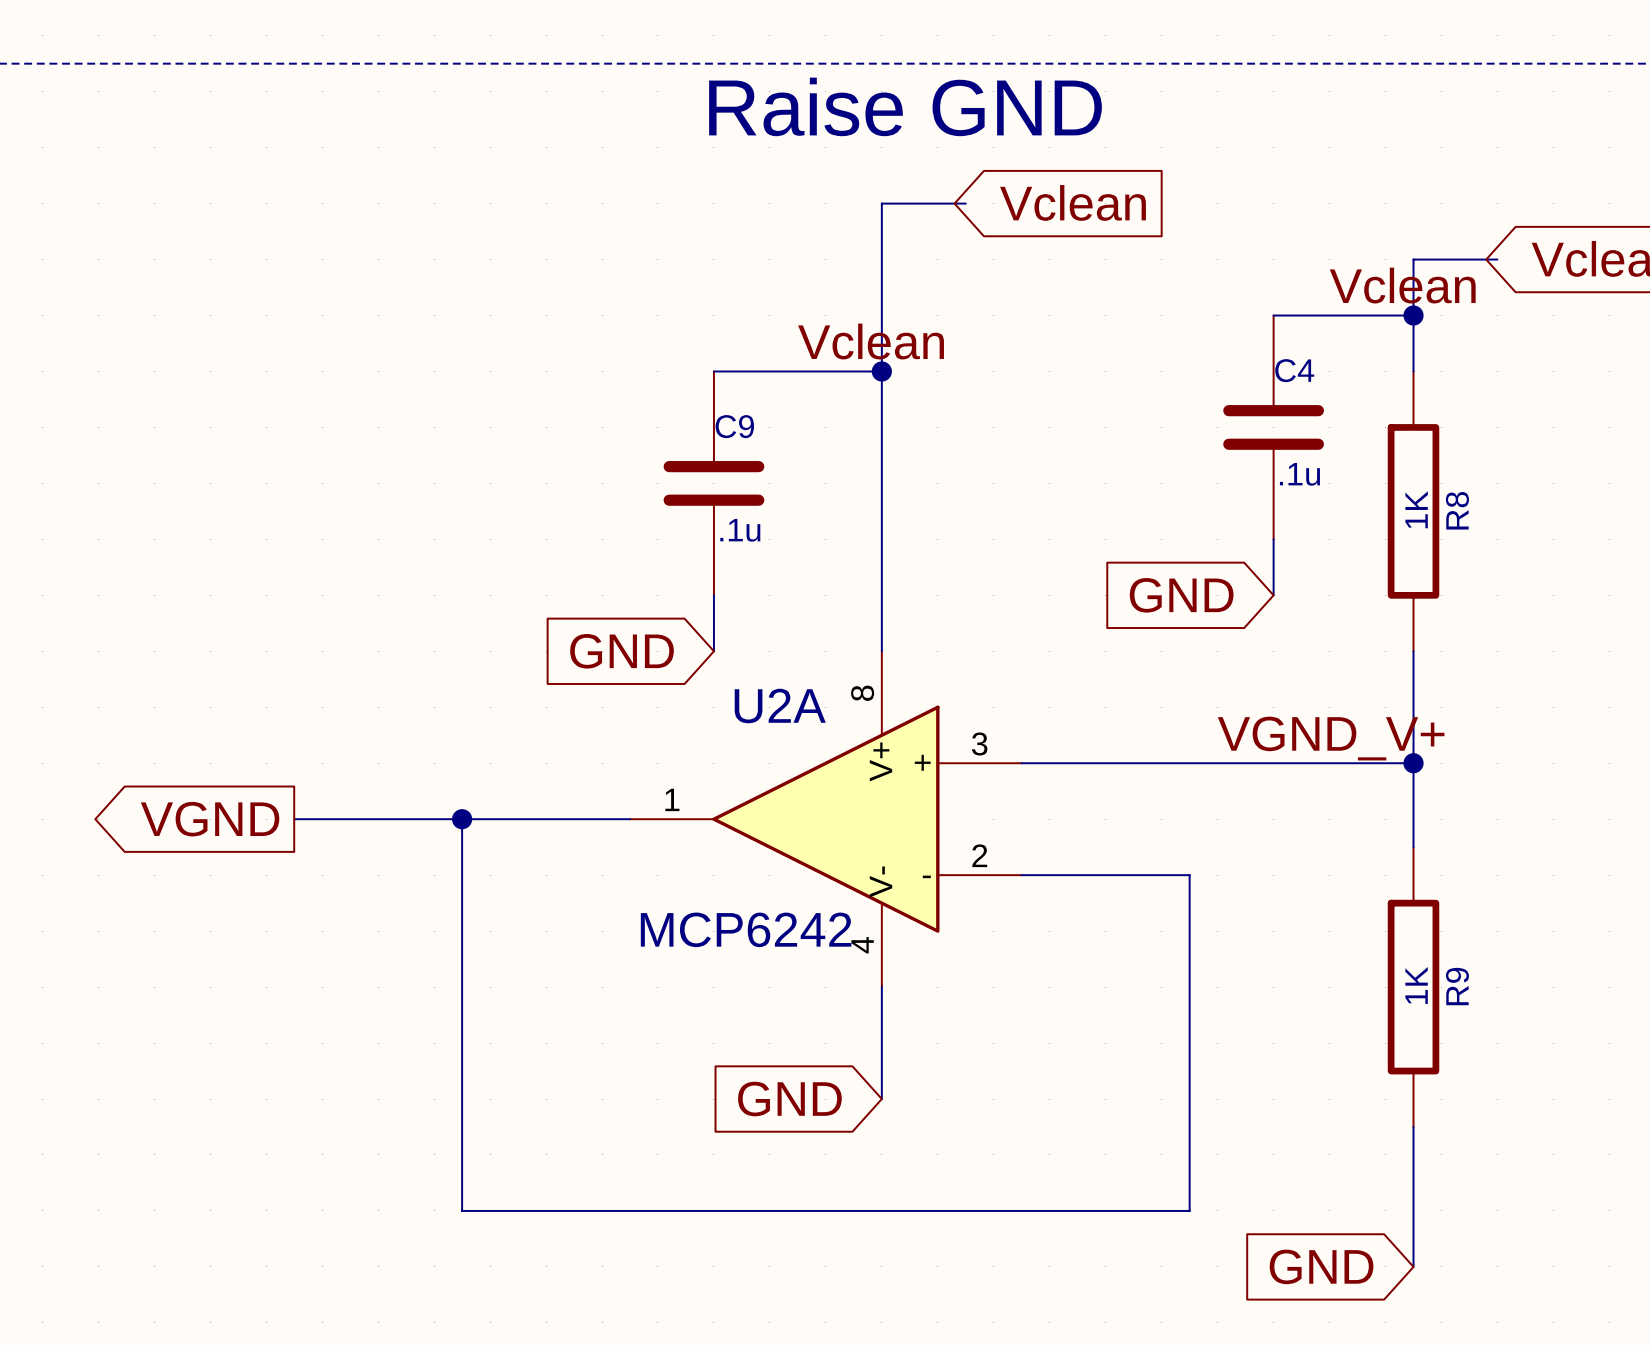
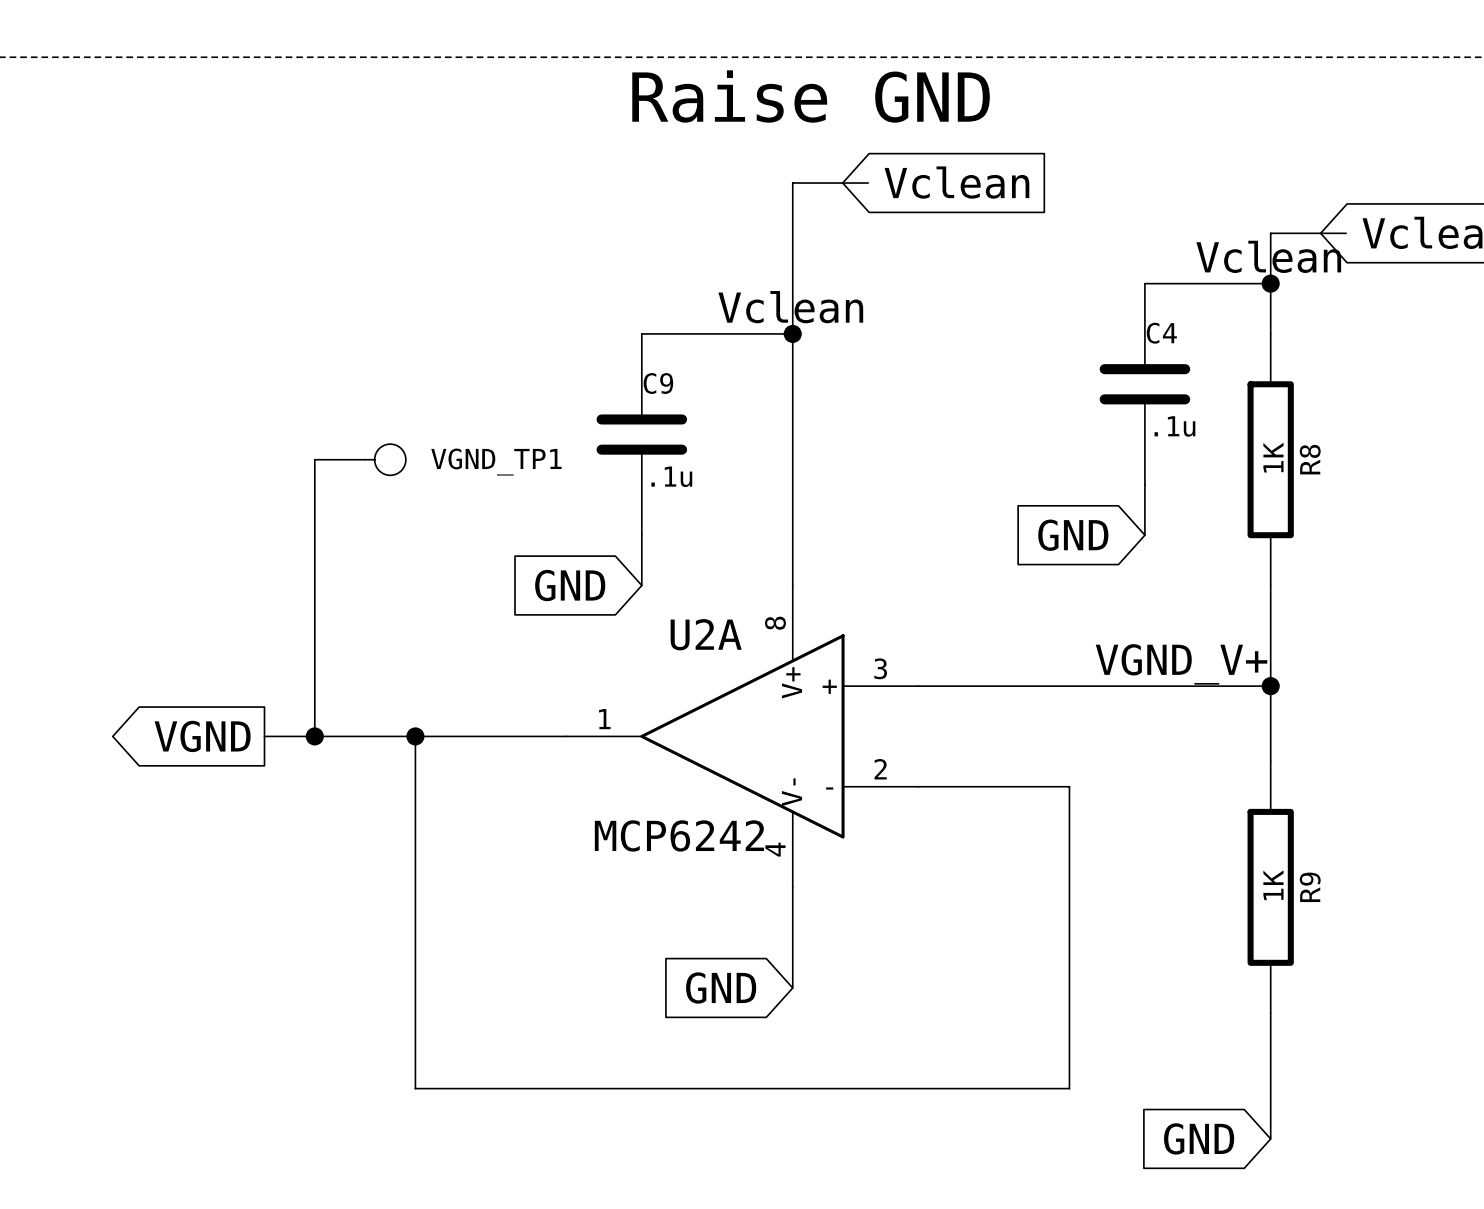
wire: none -> (314, 459) (314, 736)
VGND_TP1: none -> (360, 459)
junction: none -> (314, 736)

